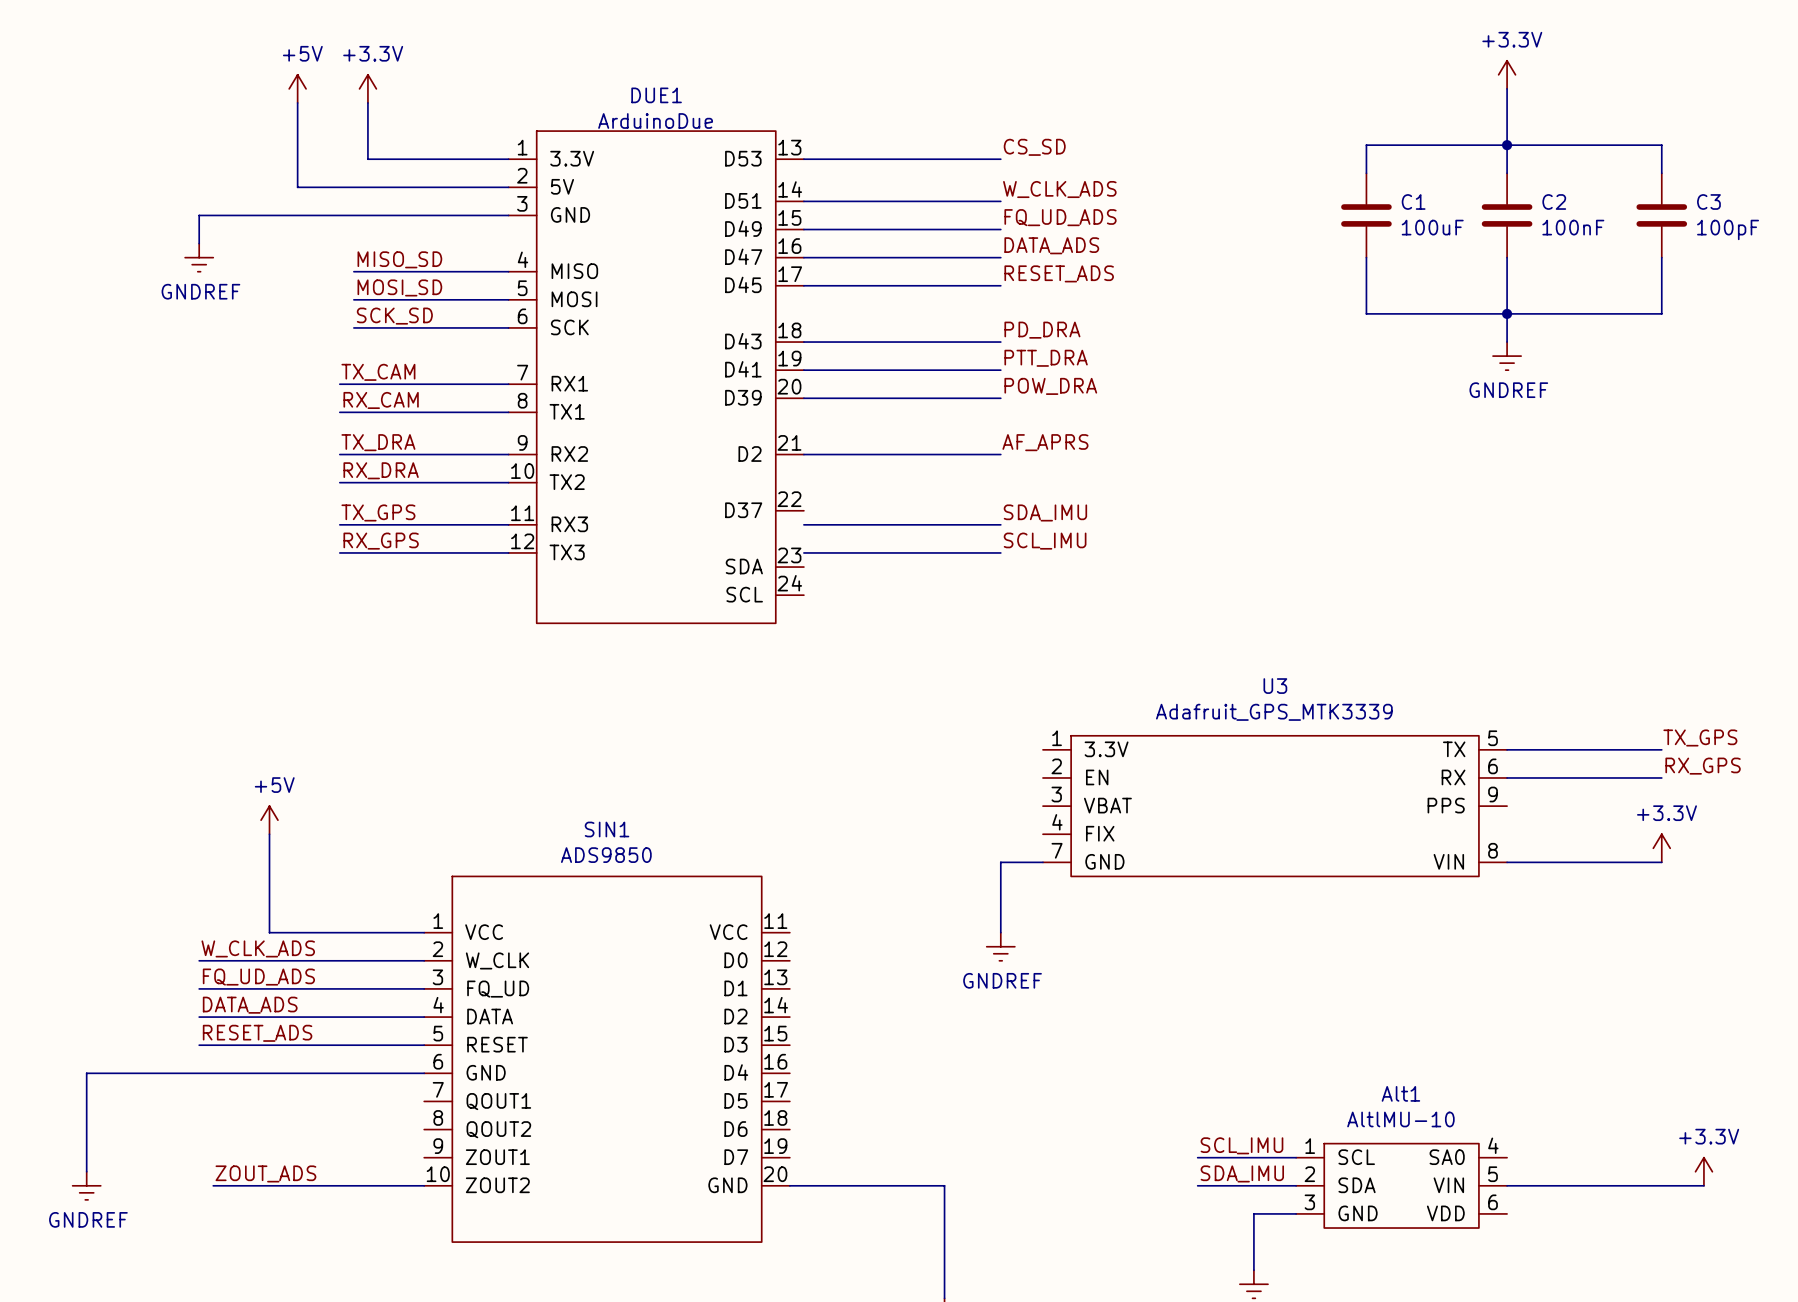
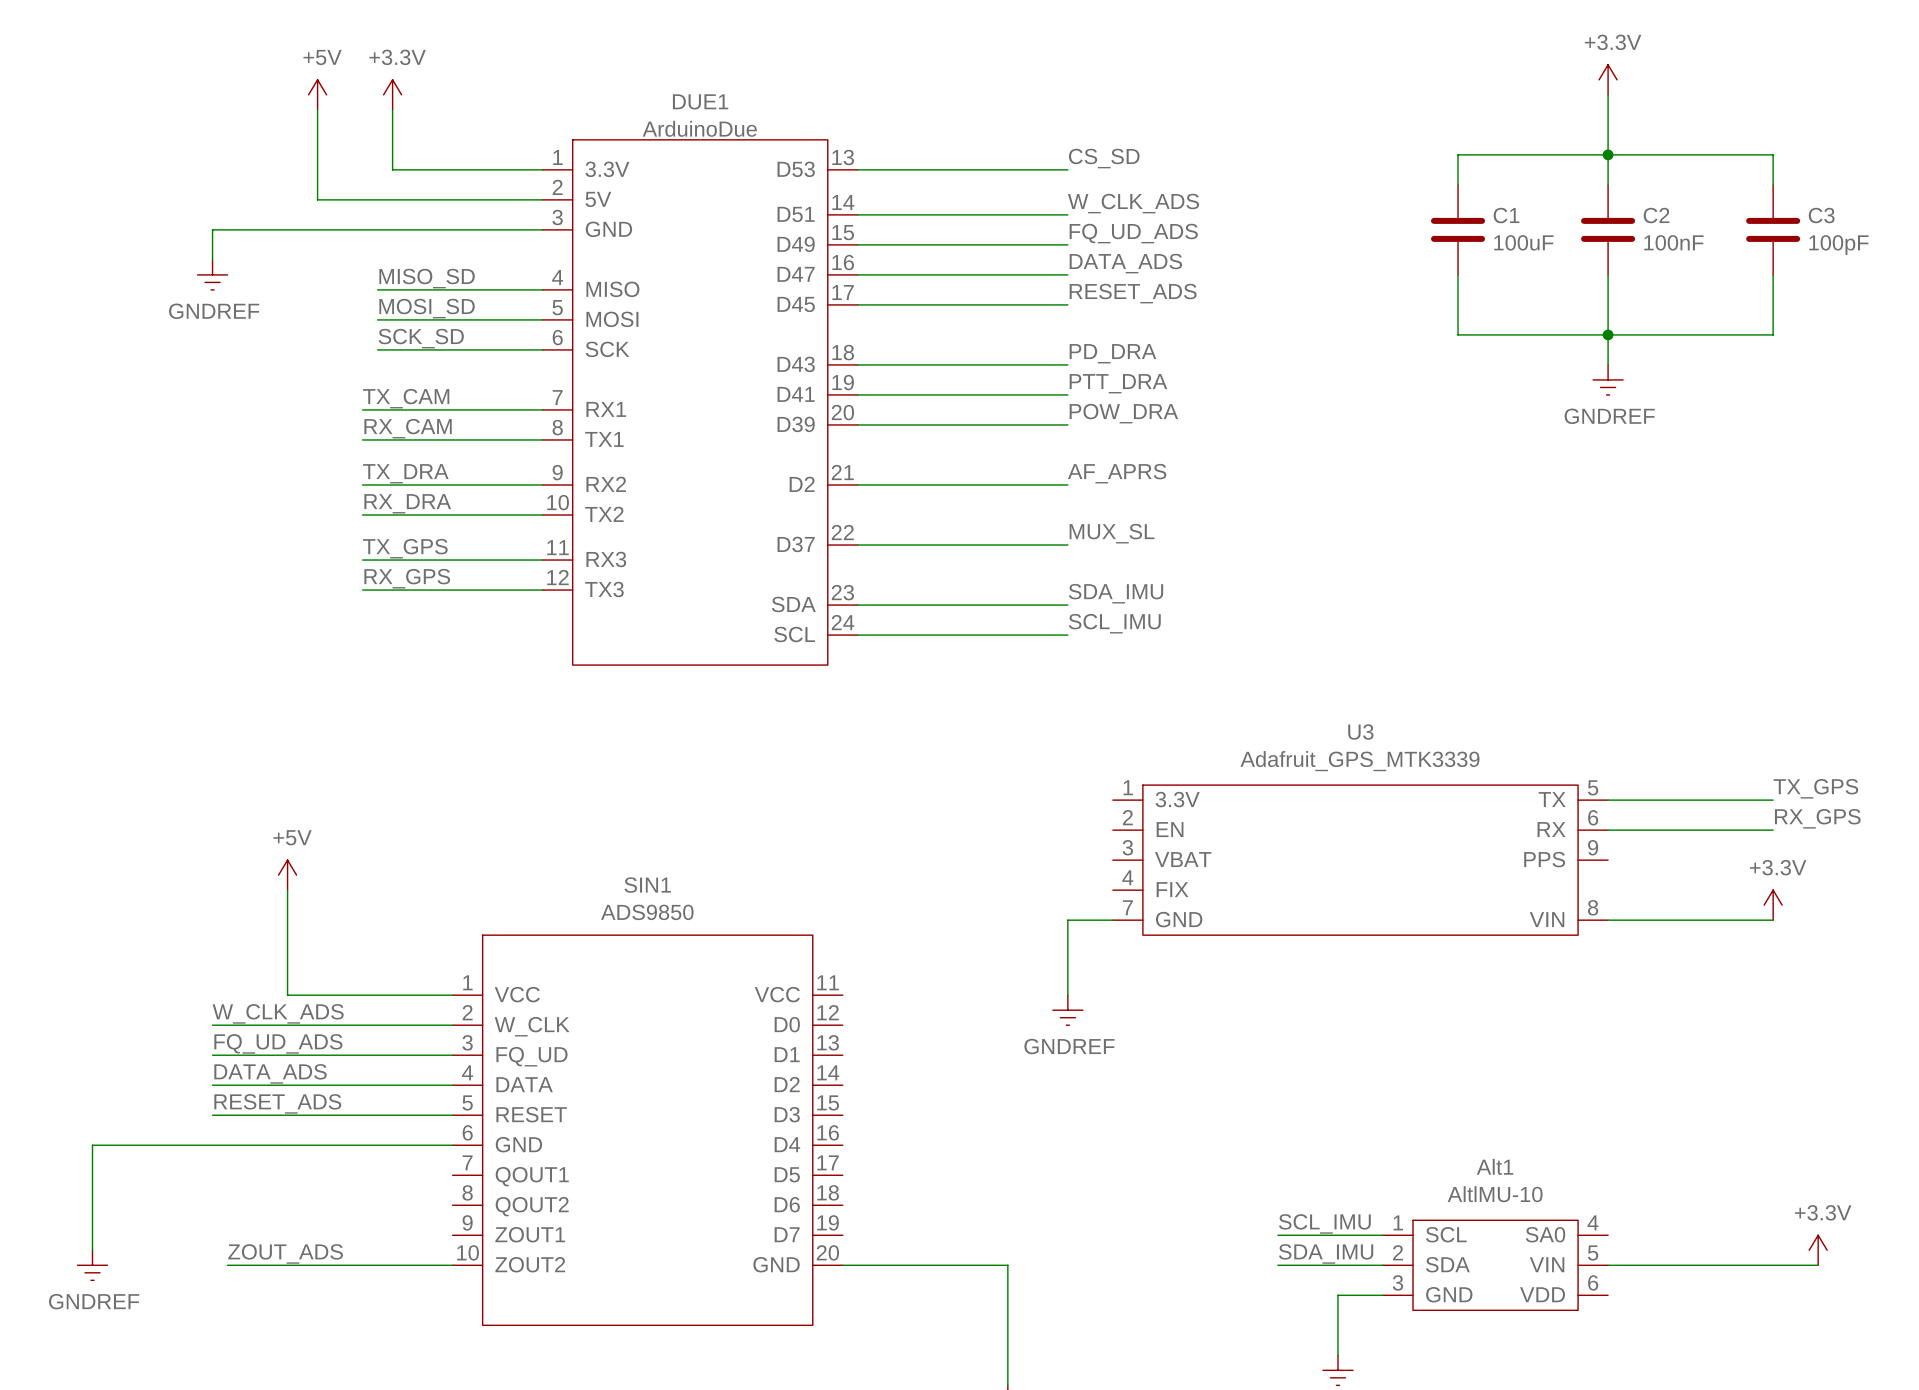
label: none -> MUX_SL (1112, 533)
wire: none -> (857, 545) (1067, 545)
label position: SDA_IMU (1045, 512) -> SDA_IMU (1116, 593)
wire: (803, 524) (1000, 524) -> (857, 605) (1067, 605)
label position: SCL_IMU (1045, 541) -> SCL_IMU (1114, 623)
wire: (803, 552) (1000, 552) -> (857, 635) (1067, 635)

